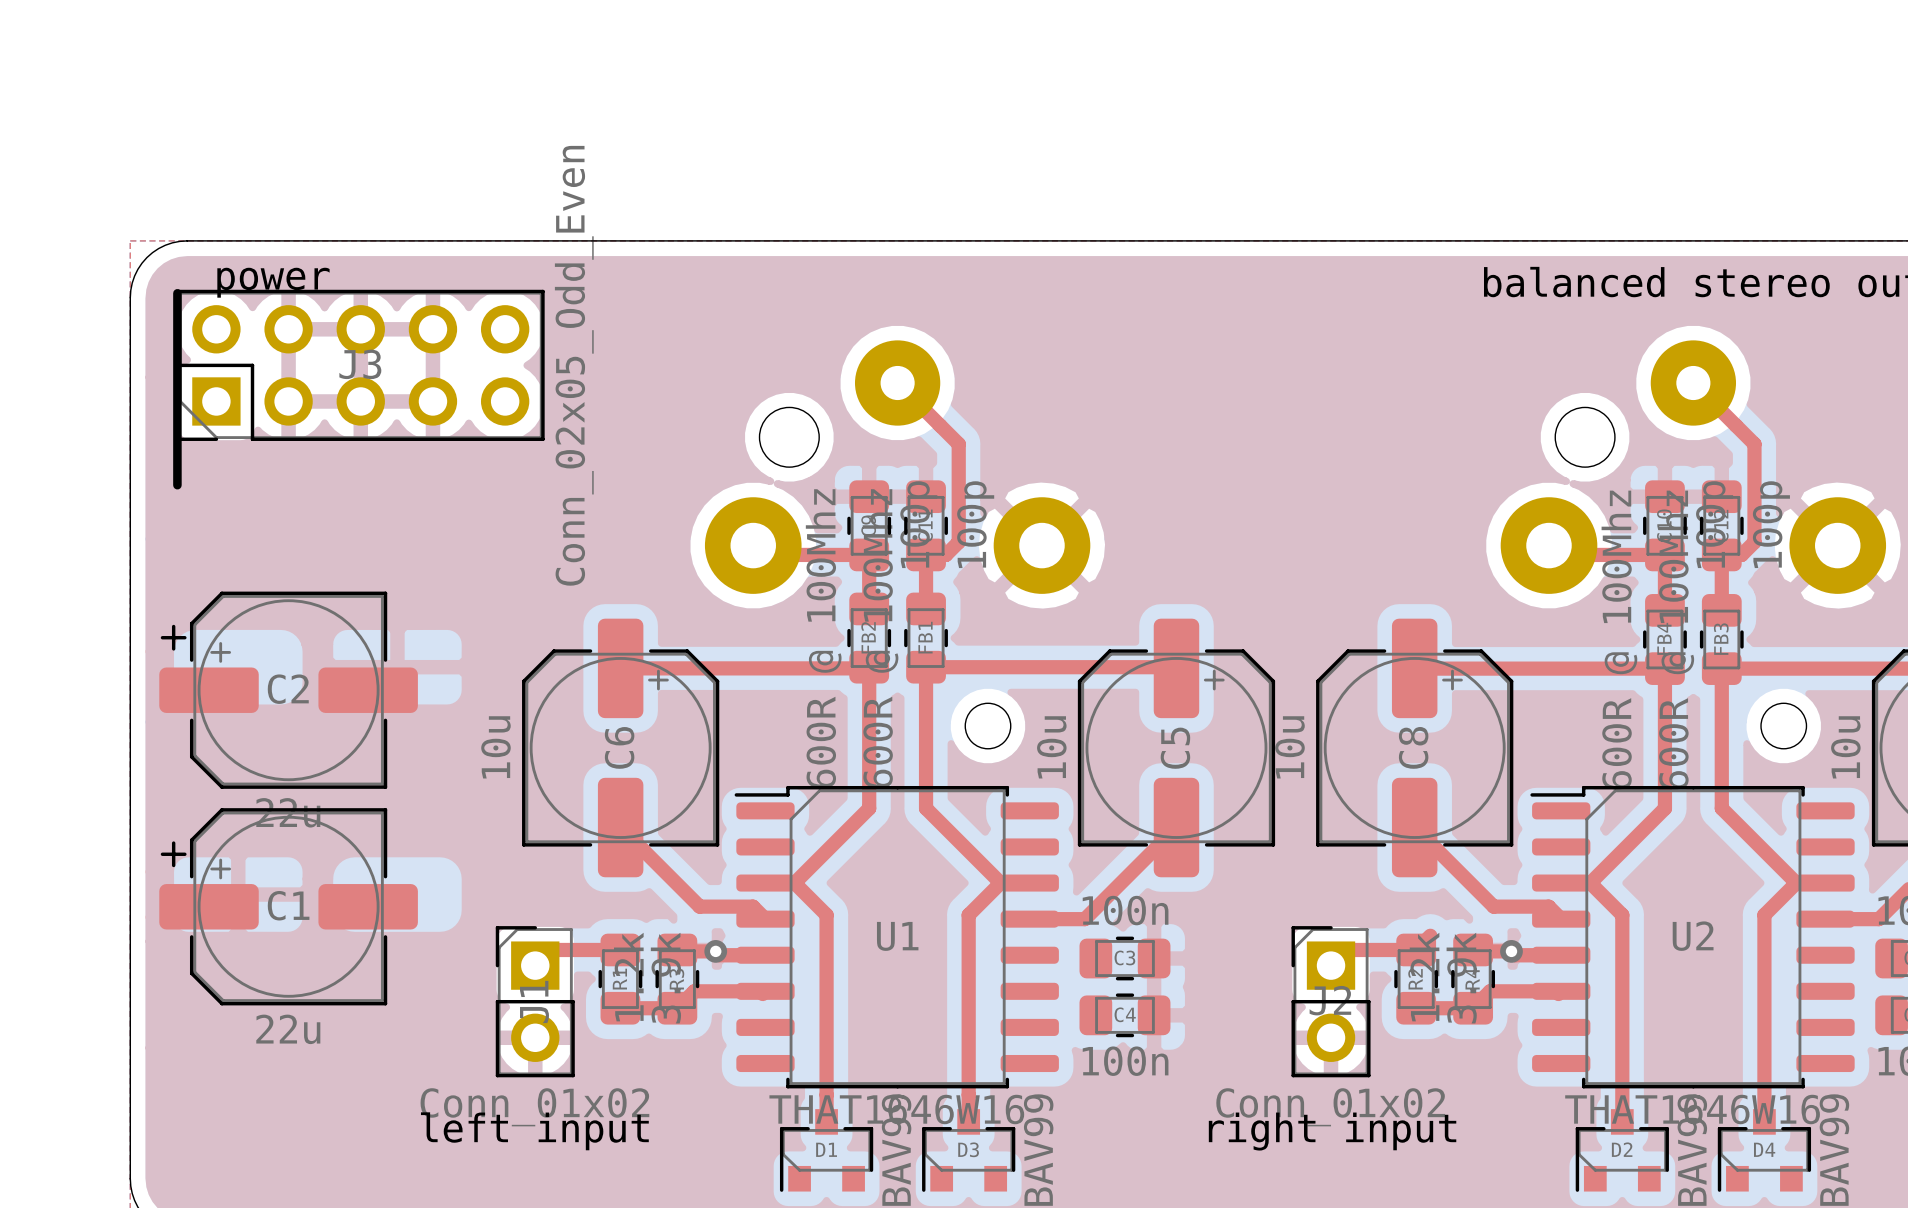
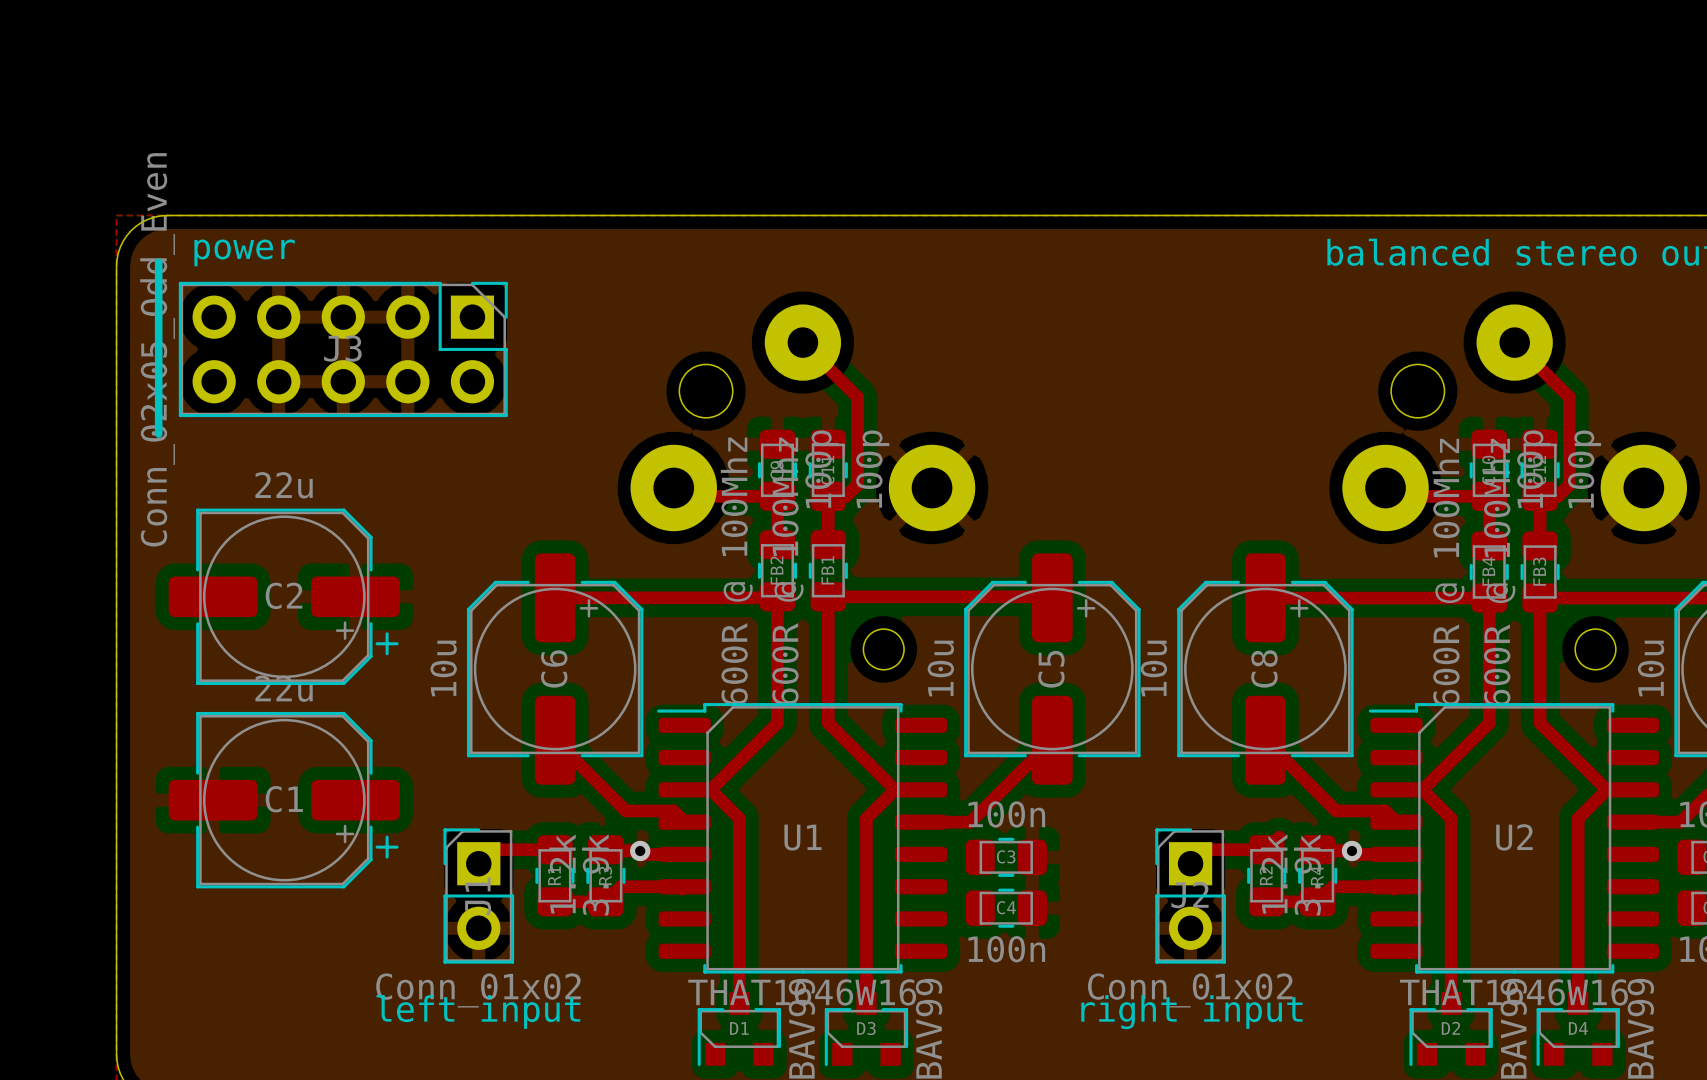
J3 rotation: 0° (360, 365) -> 180° (343, 349)
C2 rotation: 0° (288, 690) -> 180° (284, 596)
C1 rotation: 0° (288, 906) -> 180° (284, 800)

